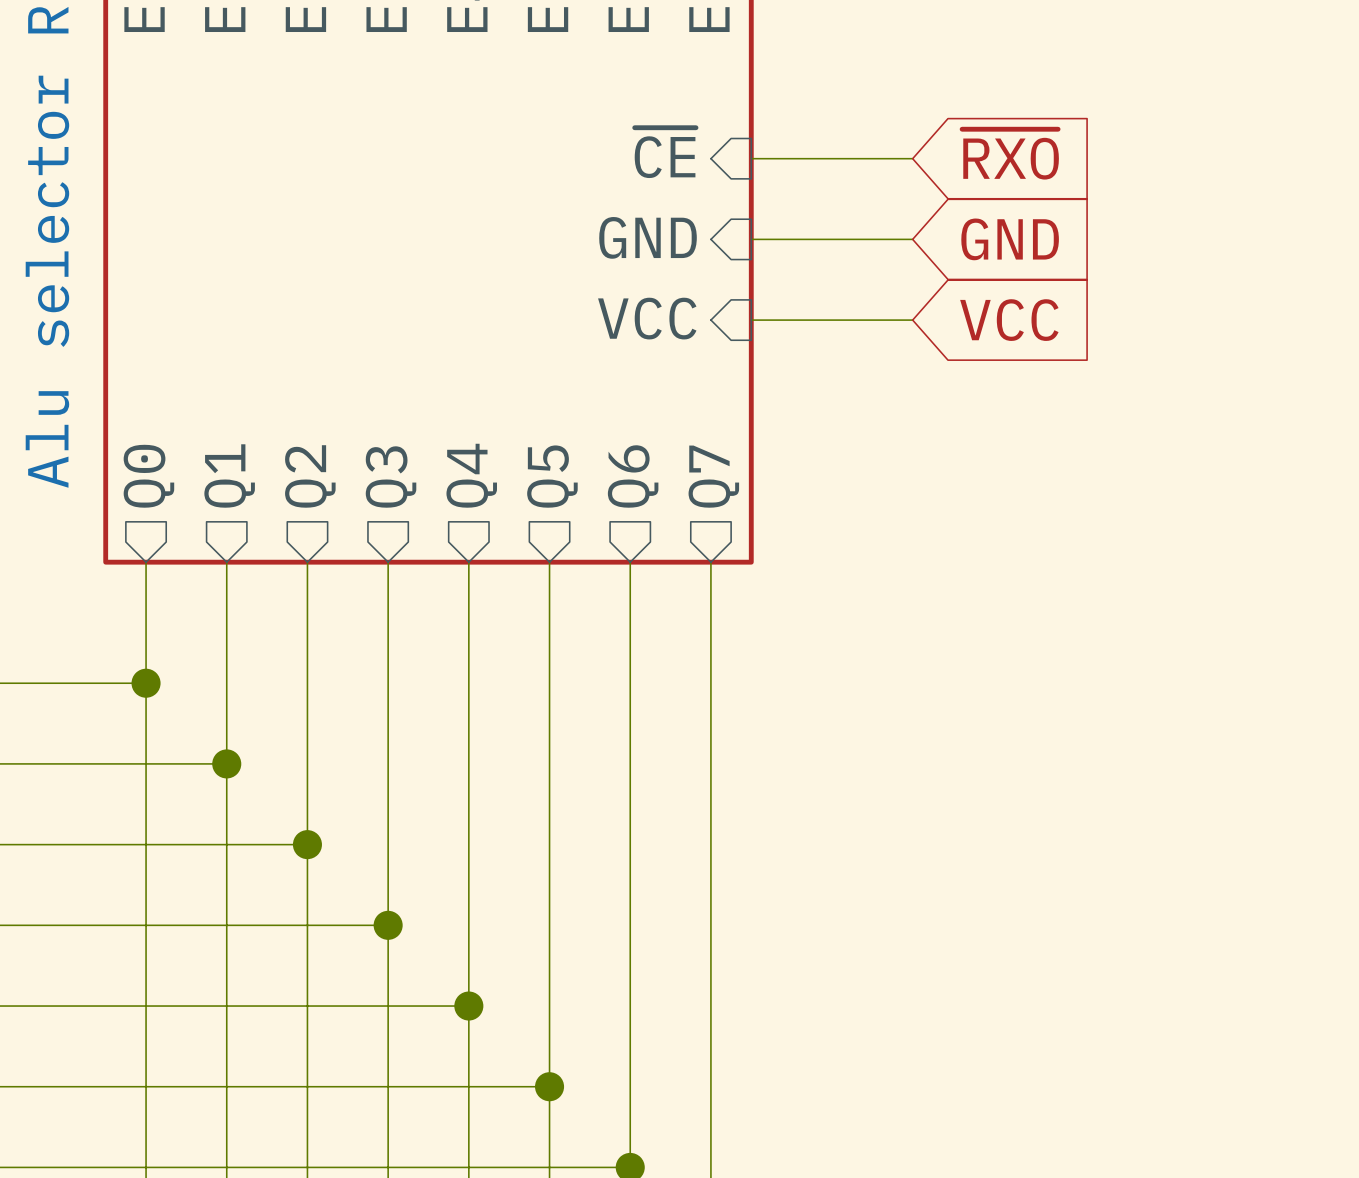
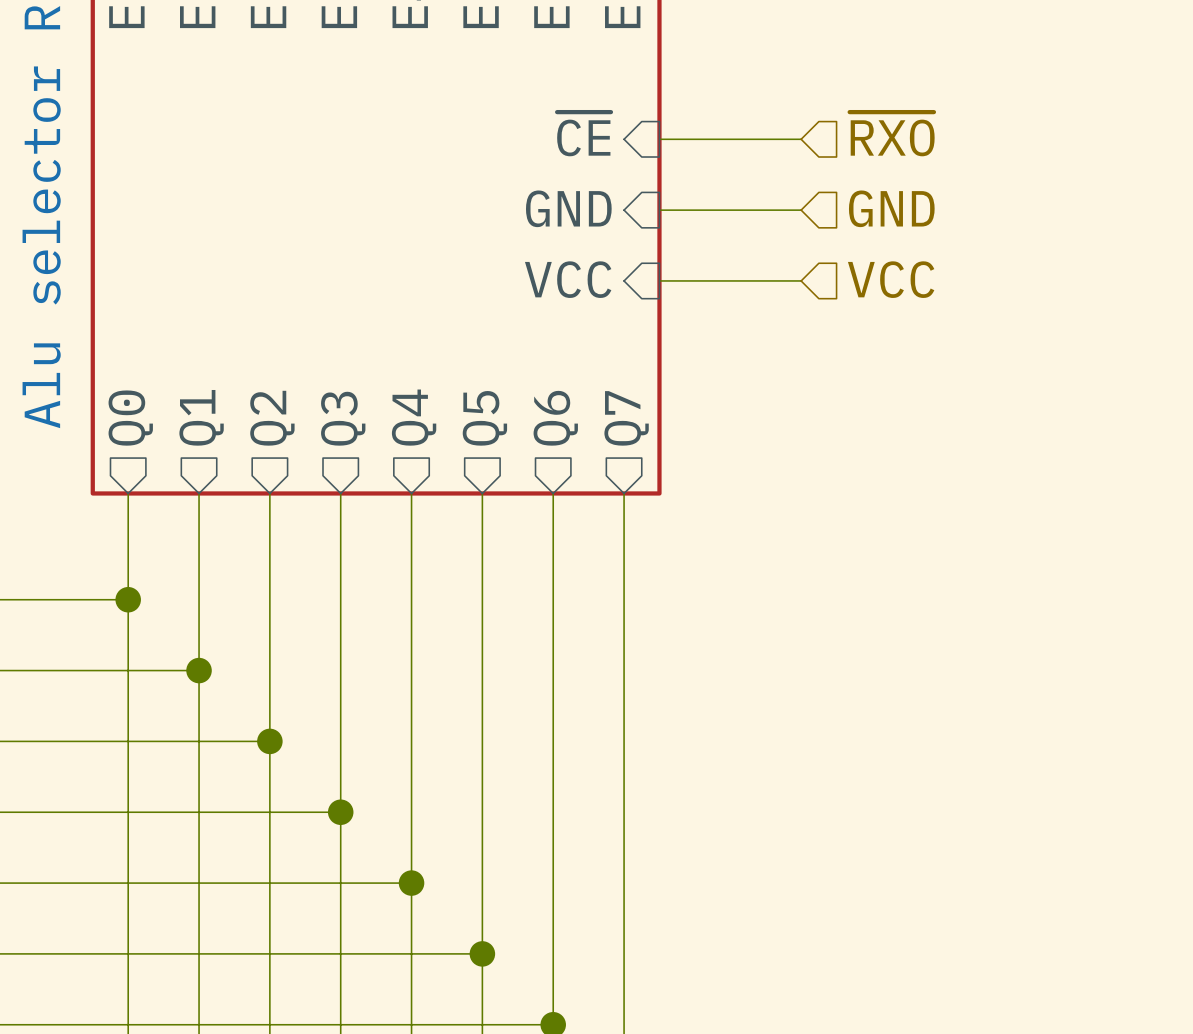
hierarchical label: none -> ~{RXO} (892, 134)
global label: ~{RXO} (1010, 154) -> none
hierarchical label: none -> GND (891, 208)
global label: GND (1010, 239) -> none
hierarchical label: none -> VCC (891, 279)
global label: VCC (1009, 320) -> none

